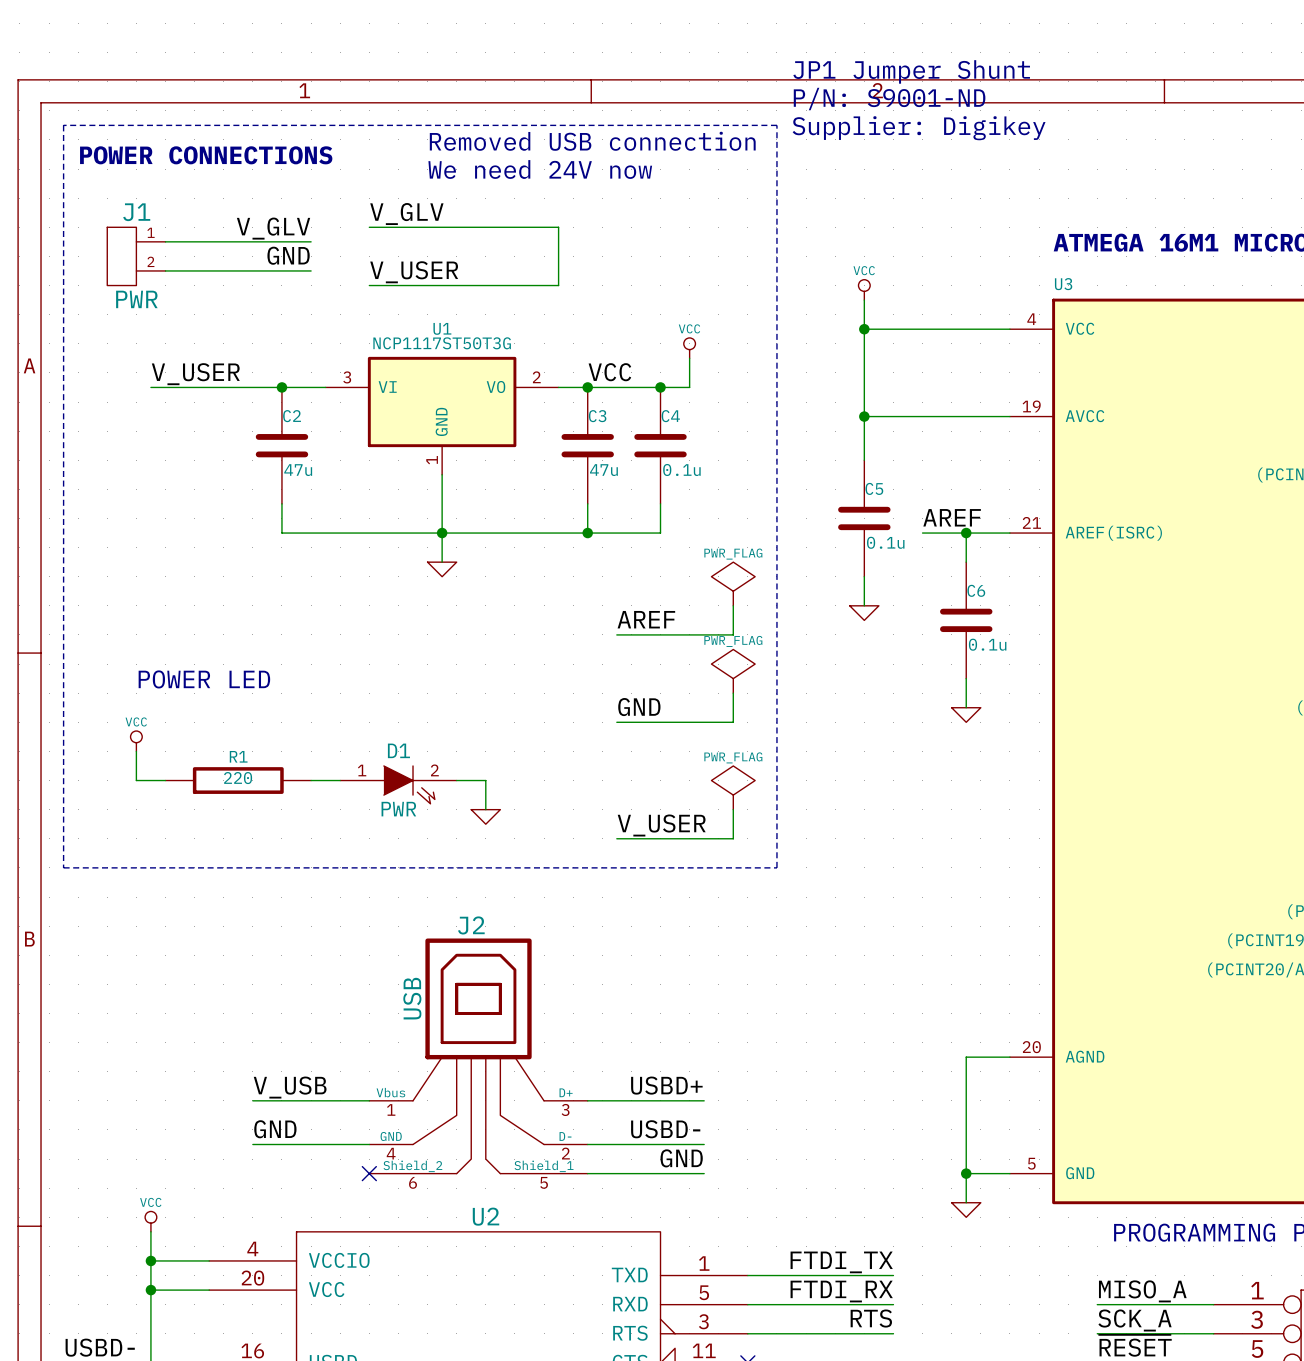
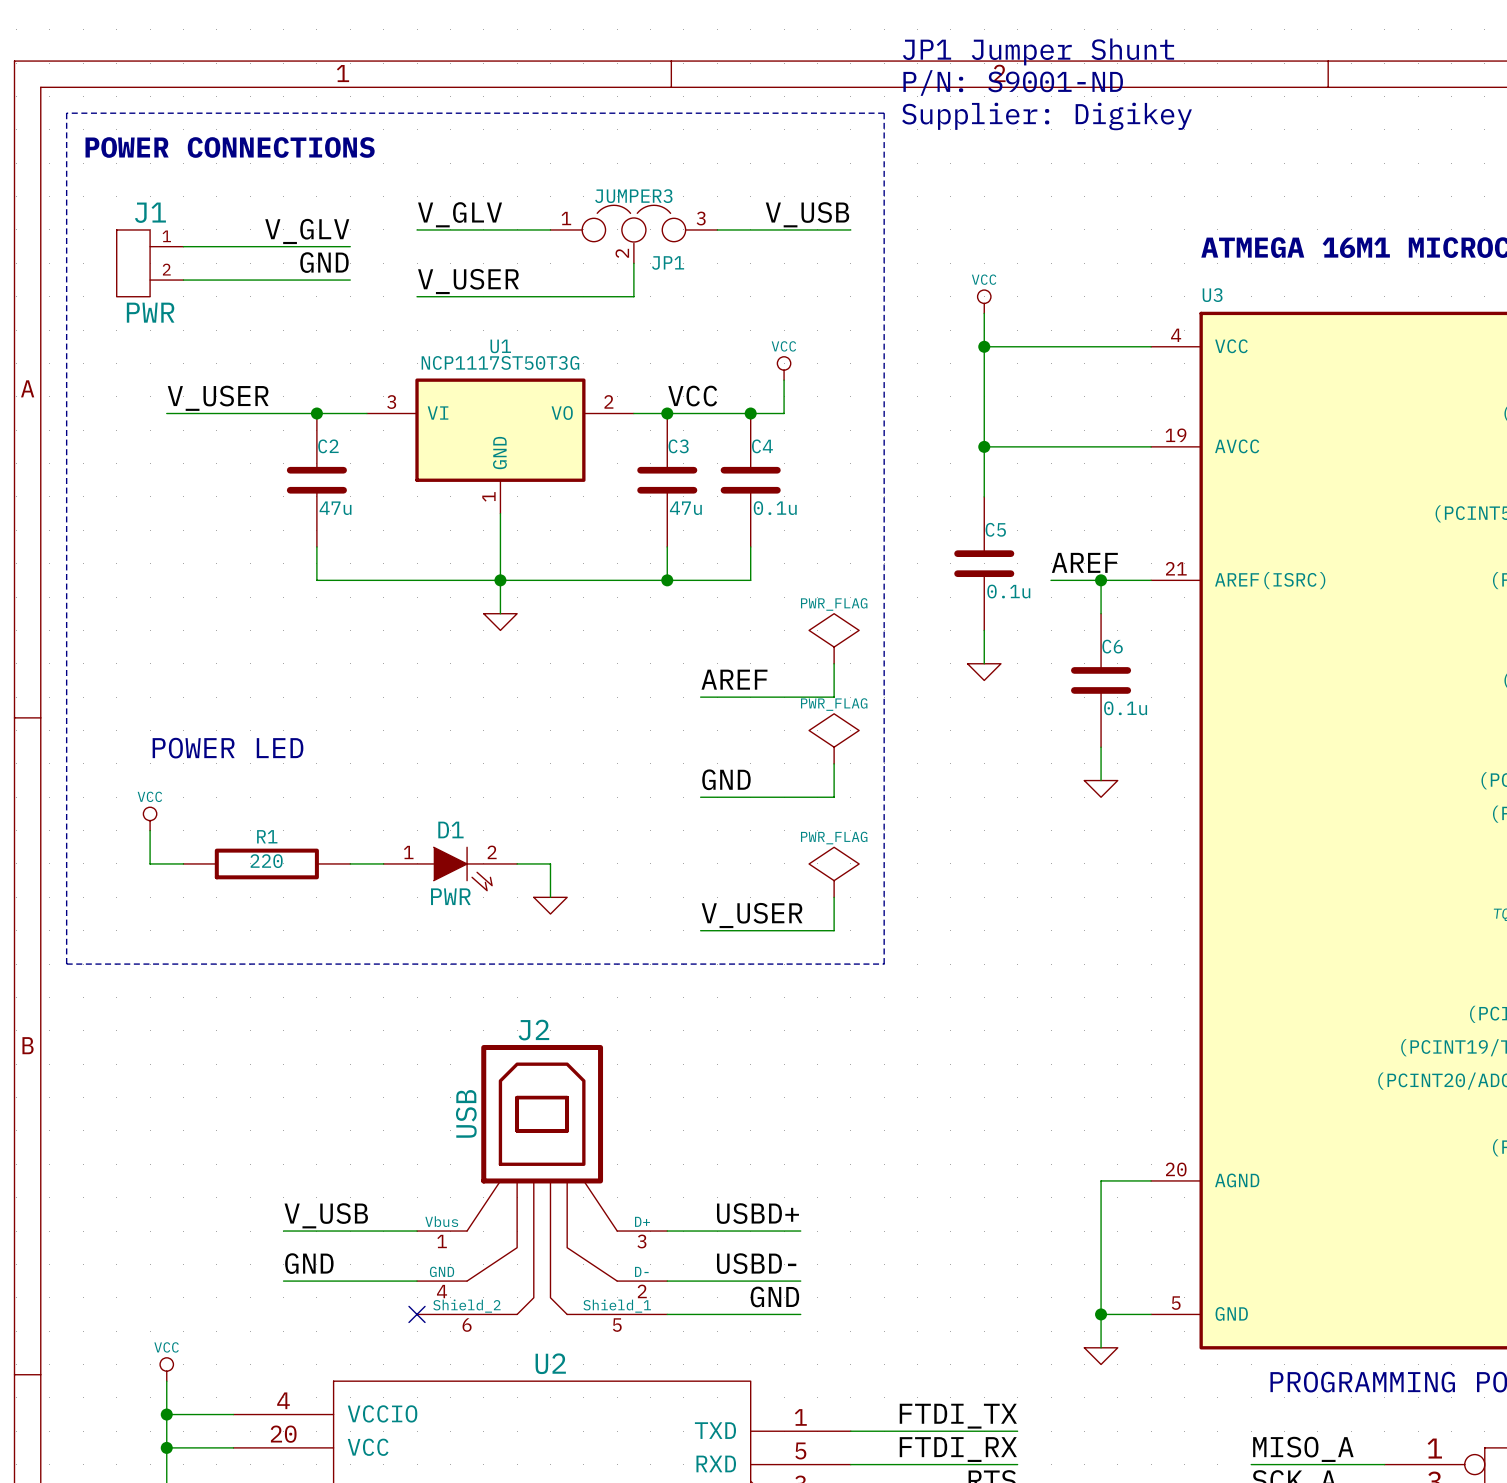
text: Removed USB connection (592, 141) -> none
text: We need 24V now (540, 169) -> none
label: none -> V_USB (807, 214)
wire: (485, 227) (558, 227) (558, 256) -> none
wire: none -> (717, 229) (850, 229)
JP1: none -> JUMPER3 (633, 234)

